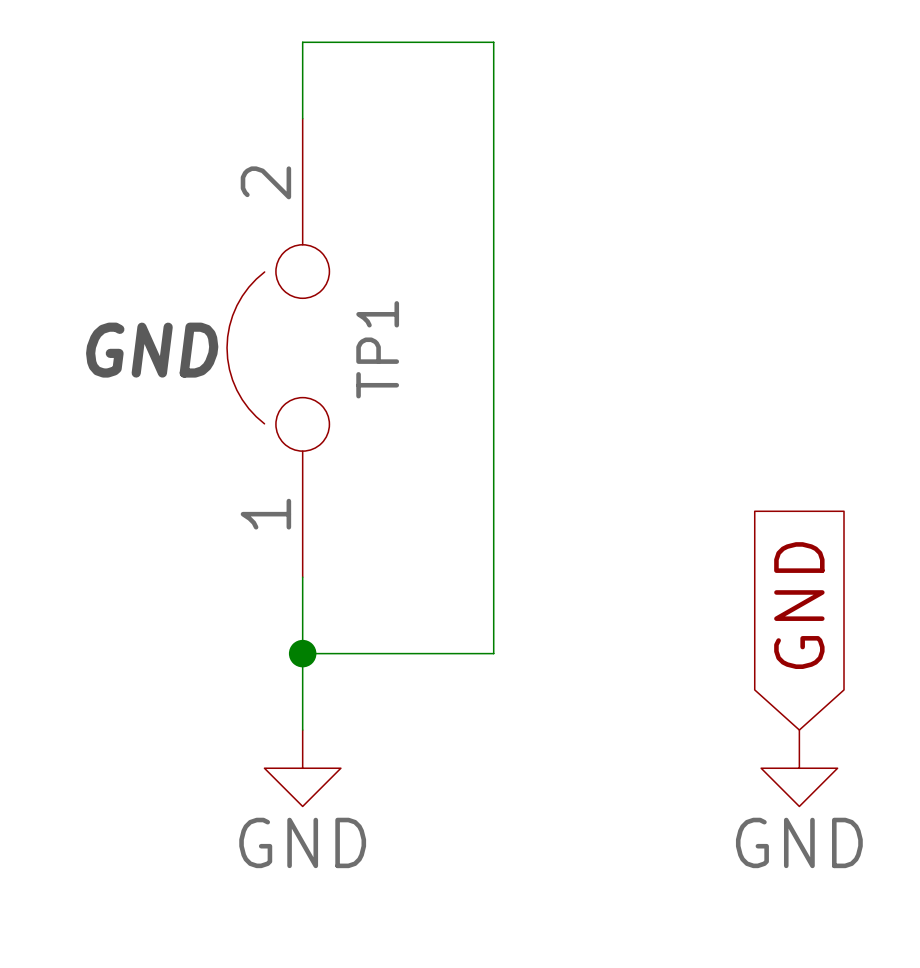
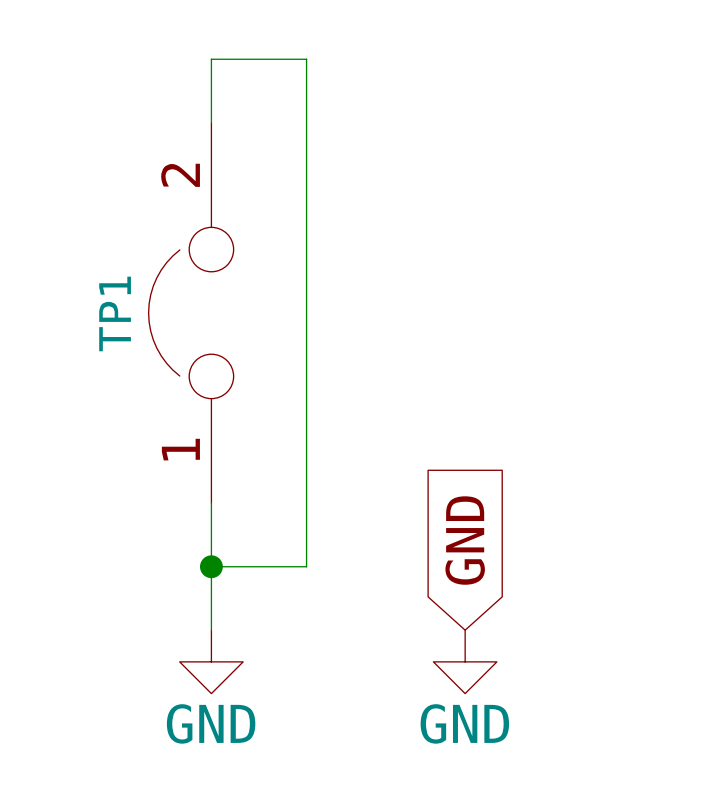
wire: (417, 42) (493, 42) (493, 653) (417, 653) -> (306, 59) (306, 566)
TP1 name position: TP1 (377, 349) -> TP1 (115, 313)
text: GND (152, 350) -> none
global label position: GND (799, 605) -> GND (465, 540)
power symbol position: GND (799, 768) -> GND (465, 661)

